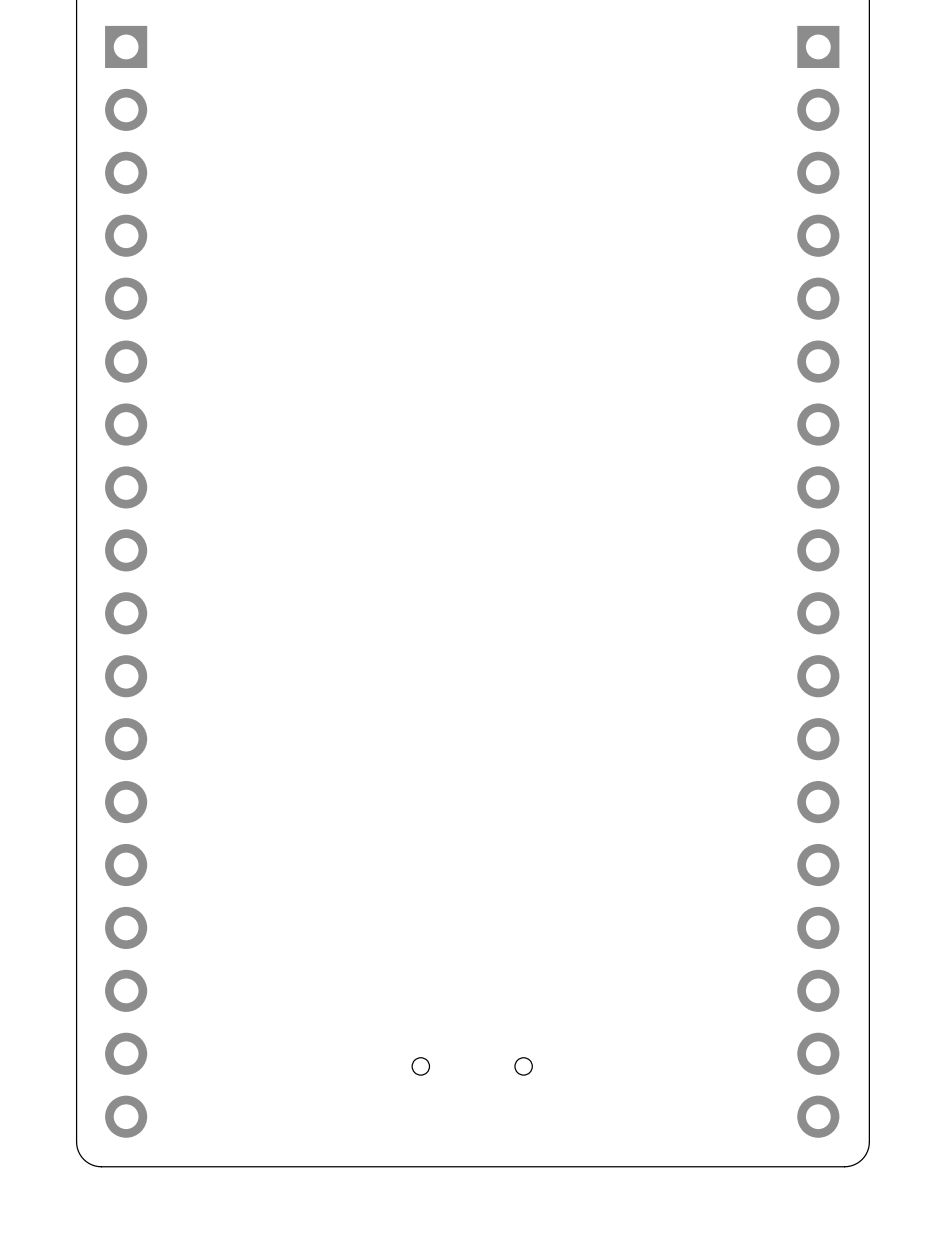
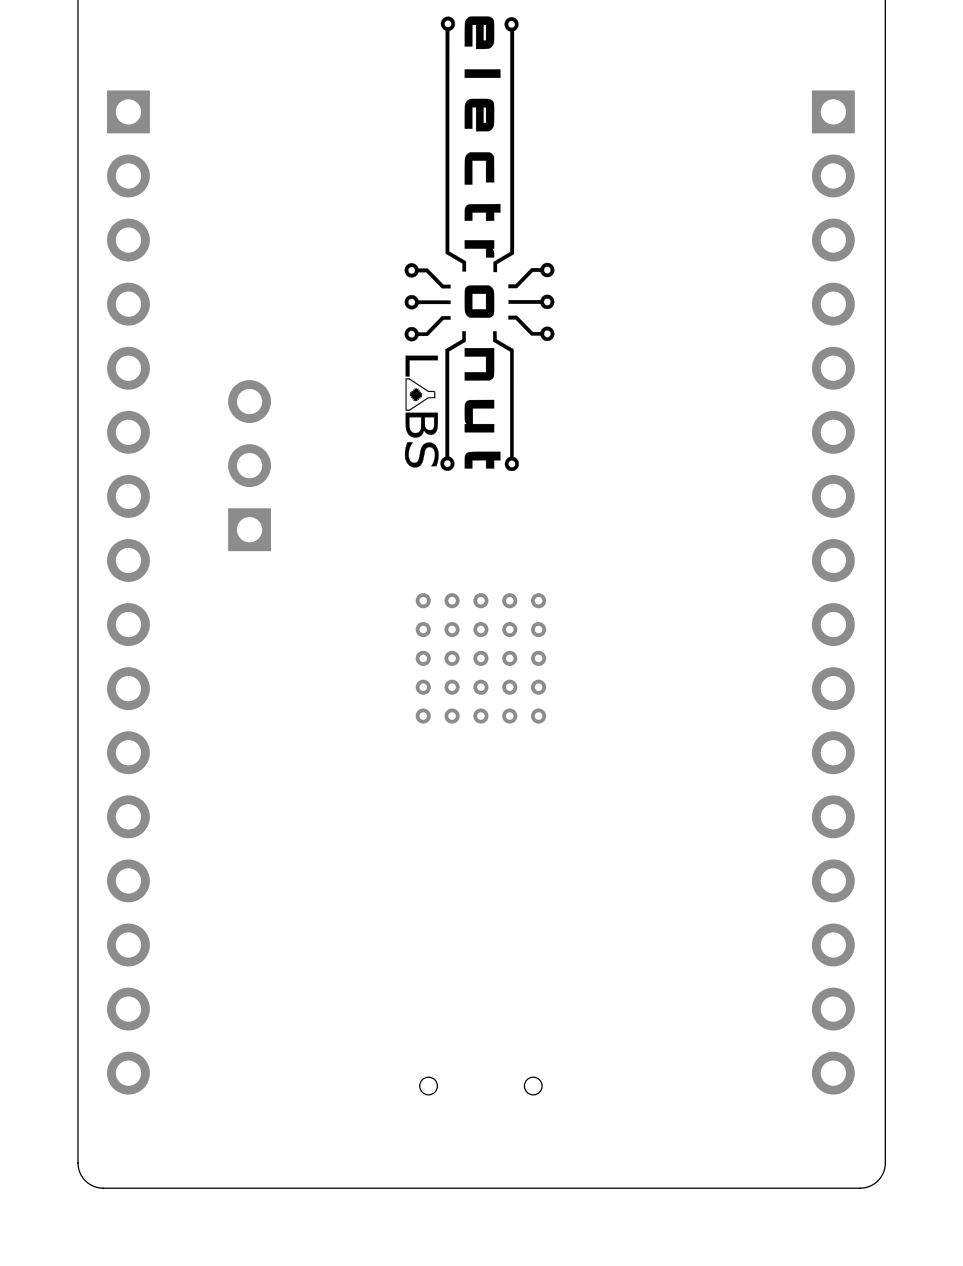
drawing: none -> [404, 16, 555, 471]
part footprint: [105, 25, 148, 1138] -> [107, 90, 150, 1095]
part footprint: [797, 25, 840, 1138] -> [811, 90, 855, 1095]
part: none -> (249, 465)
part: none -> (480, 658)

